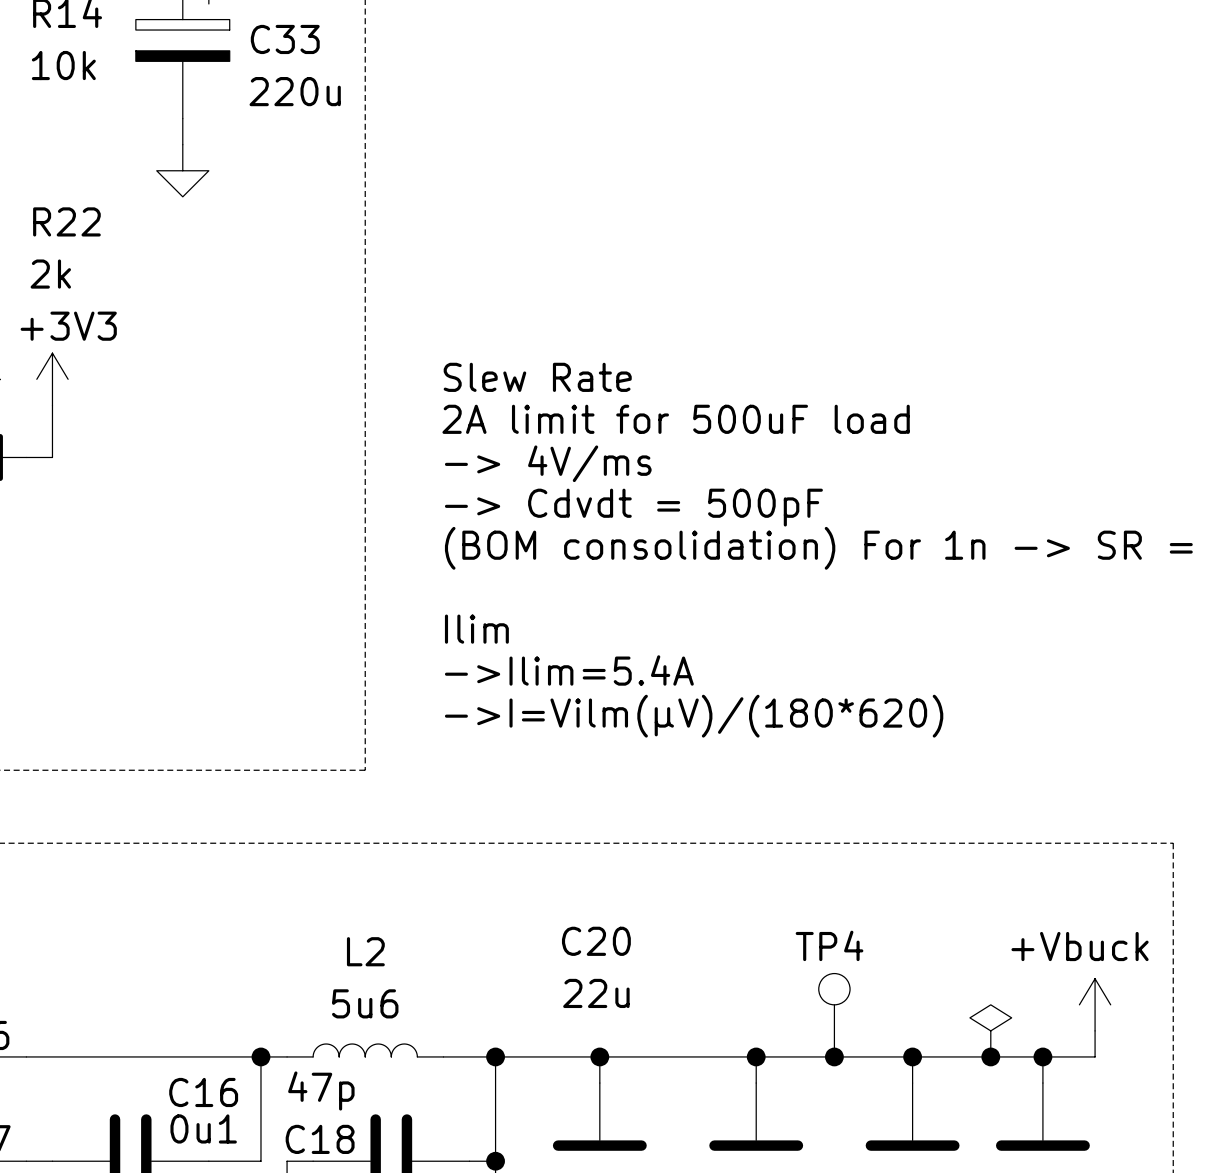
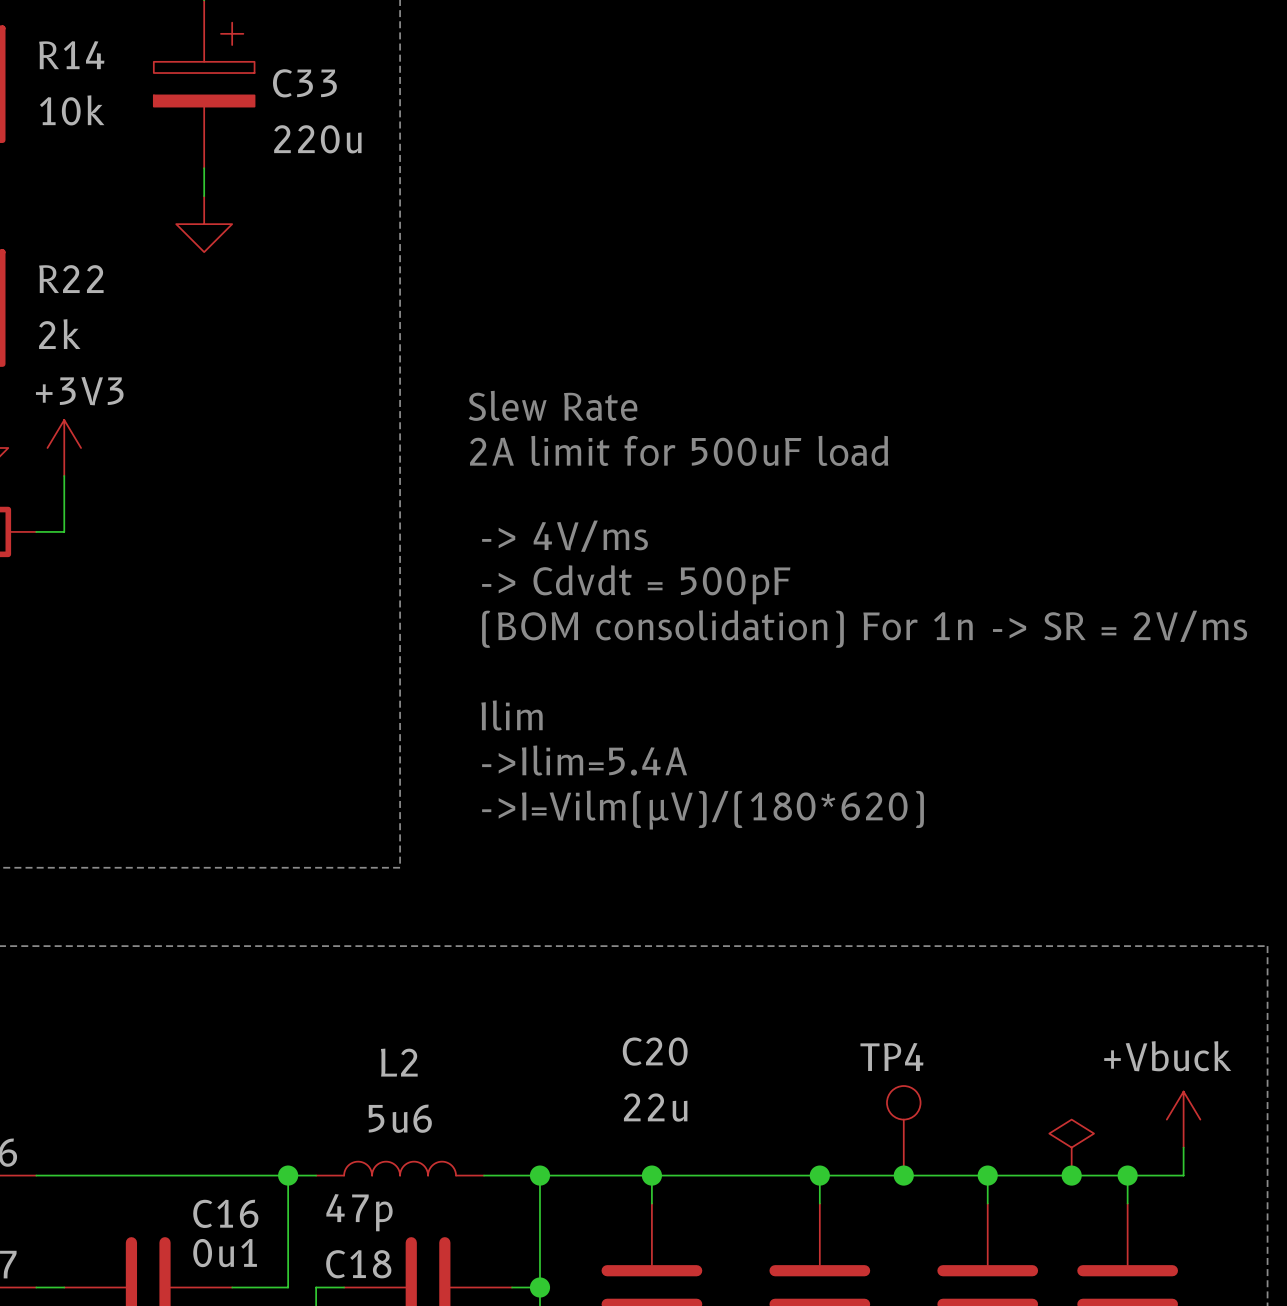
text position: Slew Rate (537, 377) -> Slew Rate (553, 405)
text position: 2A limit for 500uF load (676, 419) -> 2A limit for 500uF load (679, 450)

